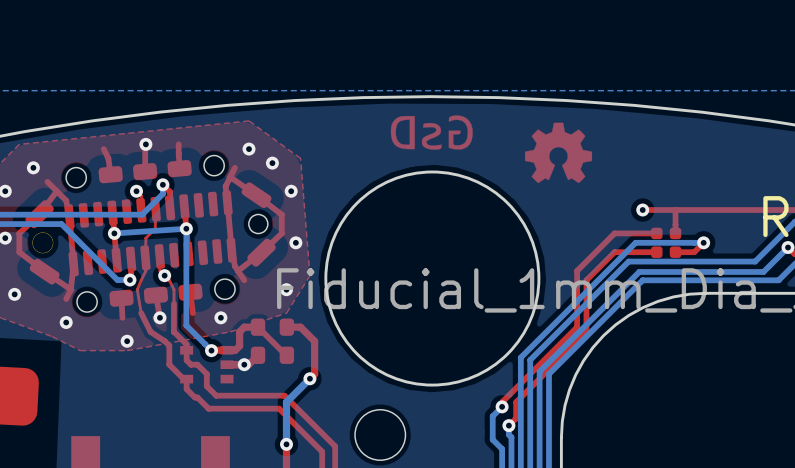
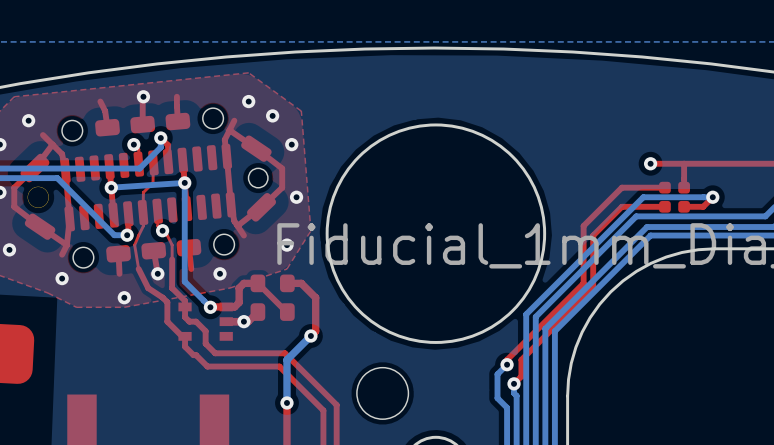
drawing: [390, 115, 473, 150] -> none
drawing: [524, 122, 593, 184] -> none

